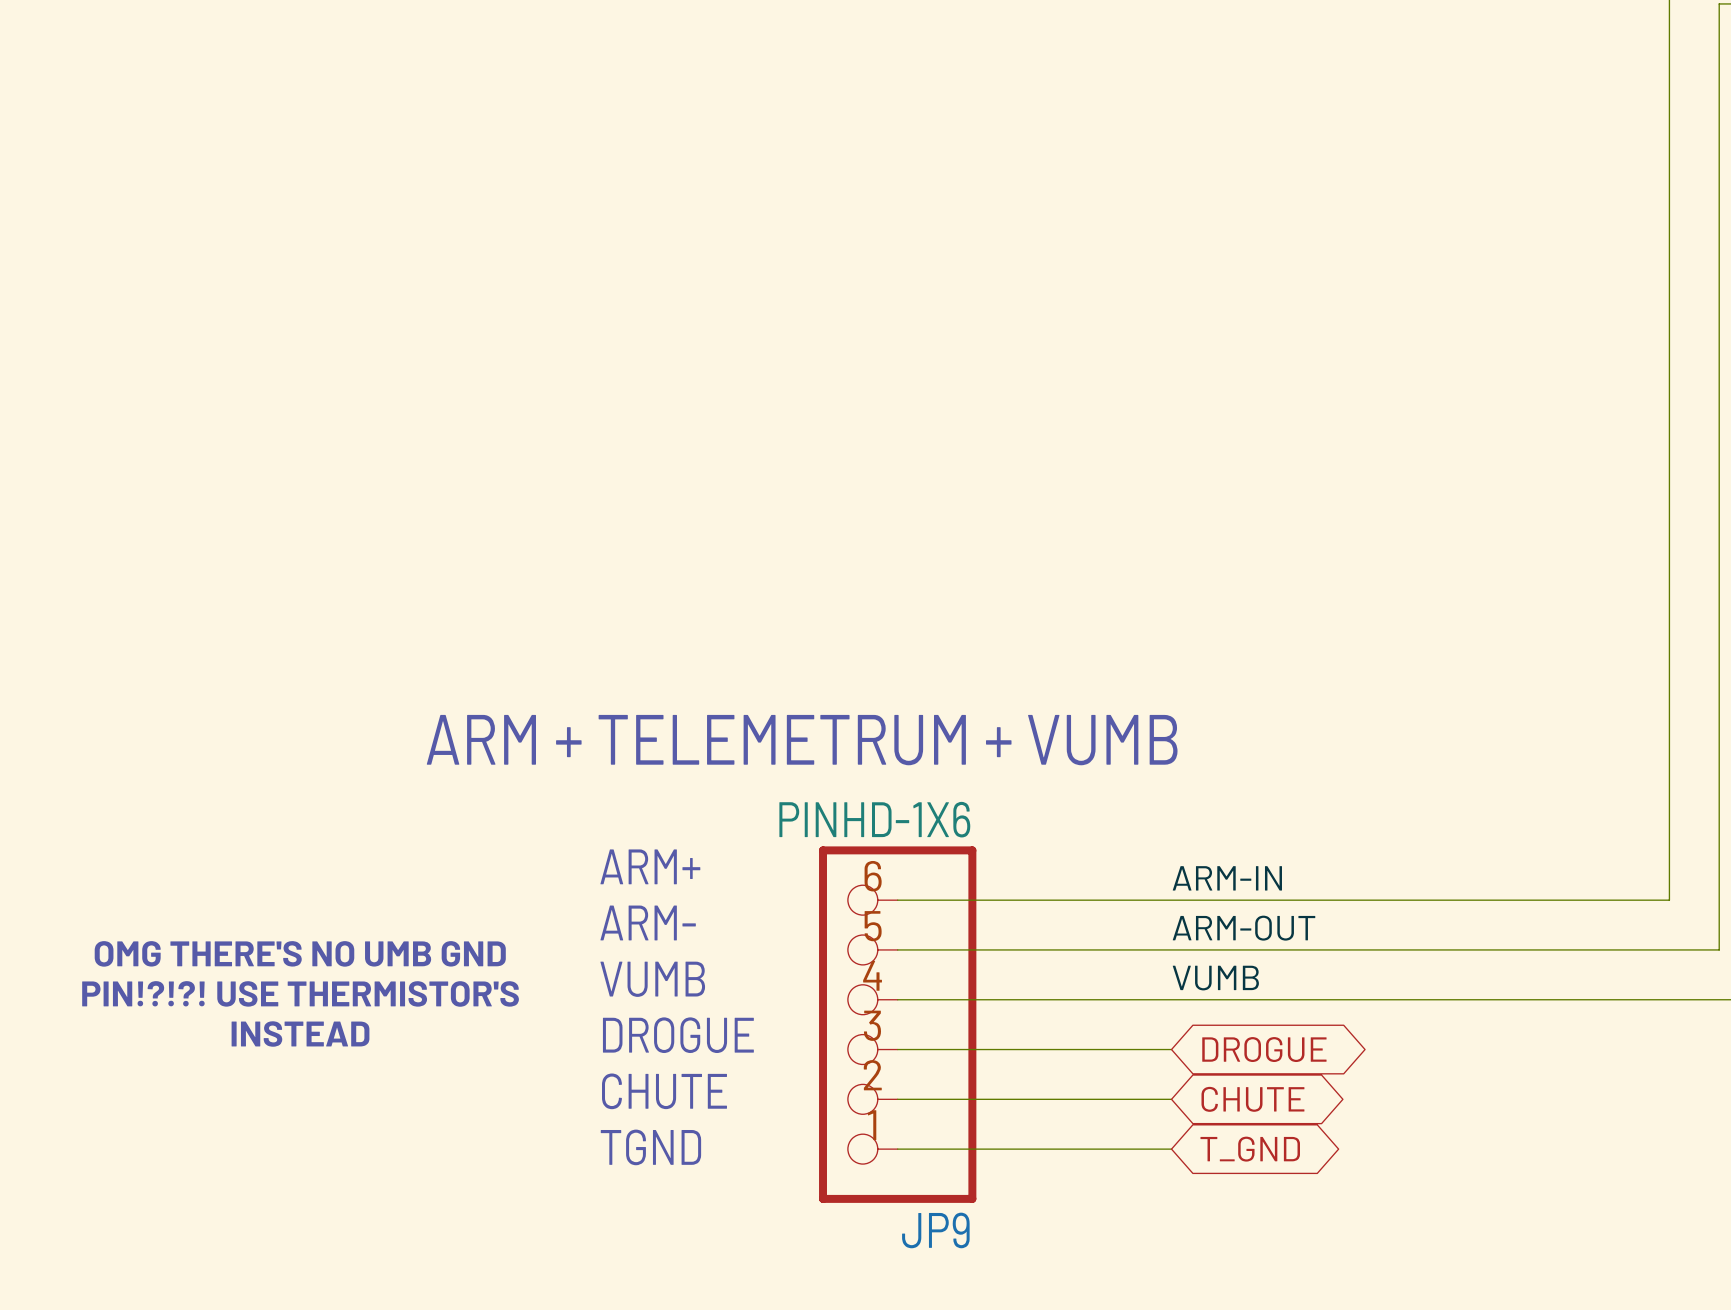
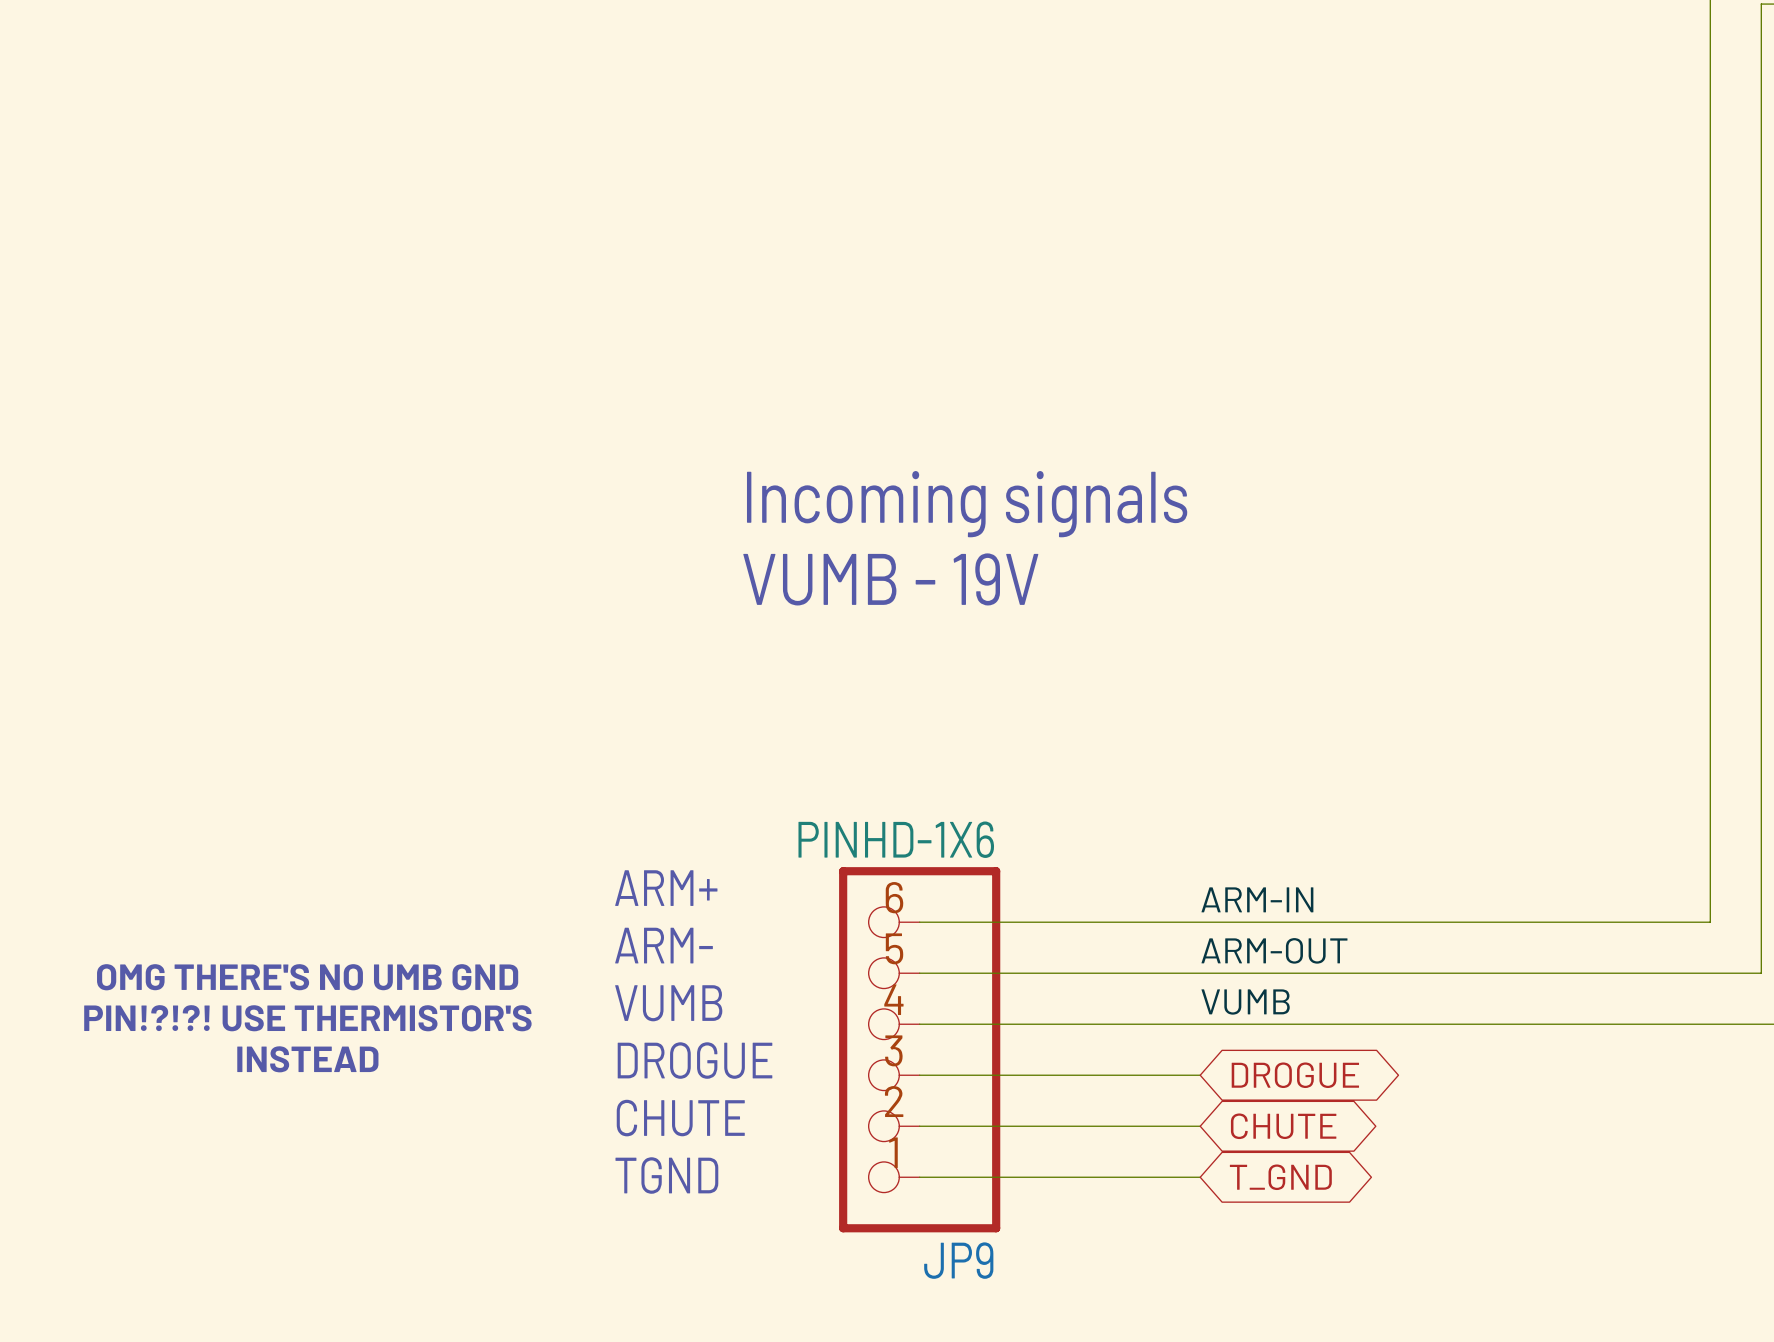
text: none -> Incoming signals (967, 504)
text: none -> VUMB - 19V (890, 579)
text: ARM + TELEMETRUM + VUMB (802, 740) -> none

